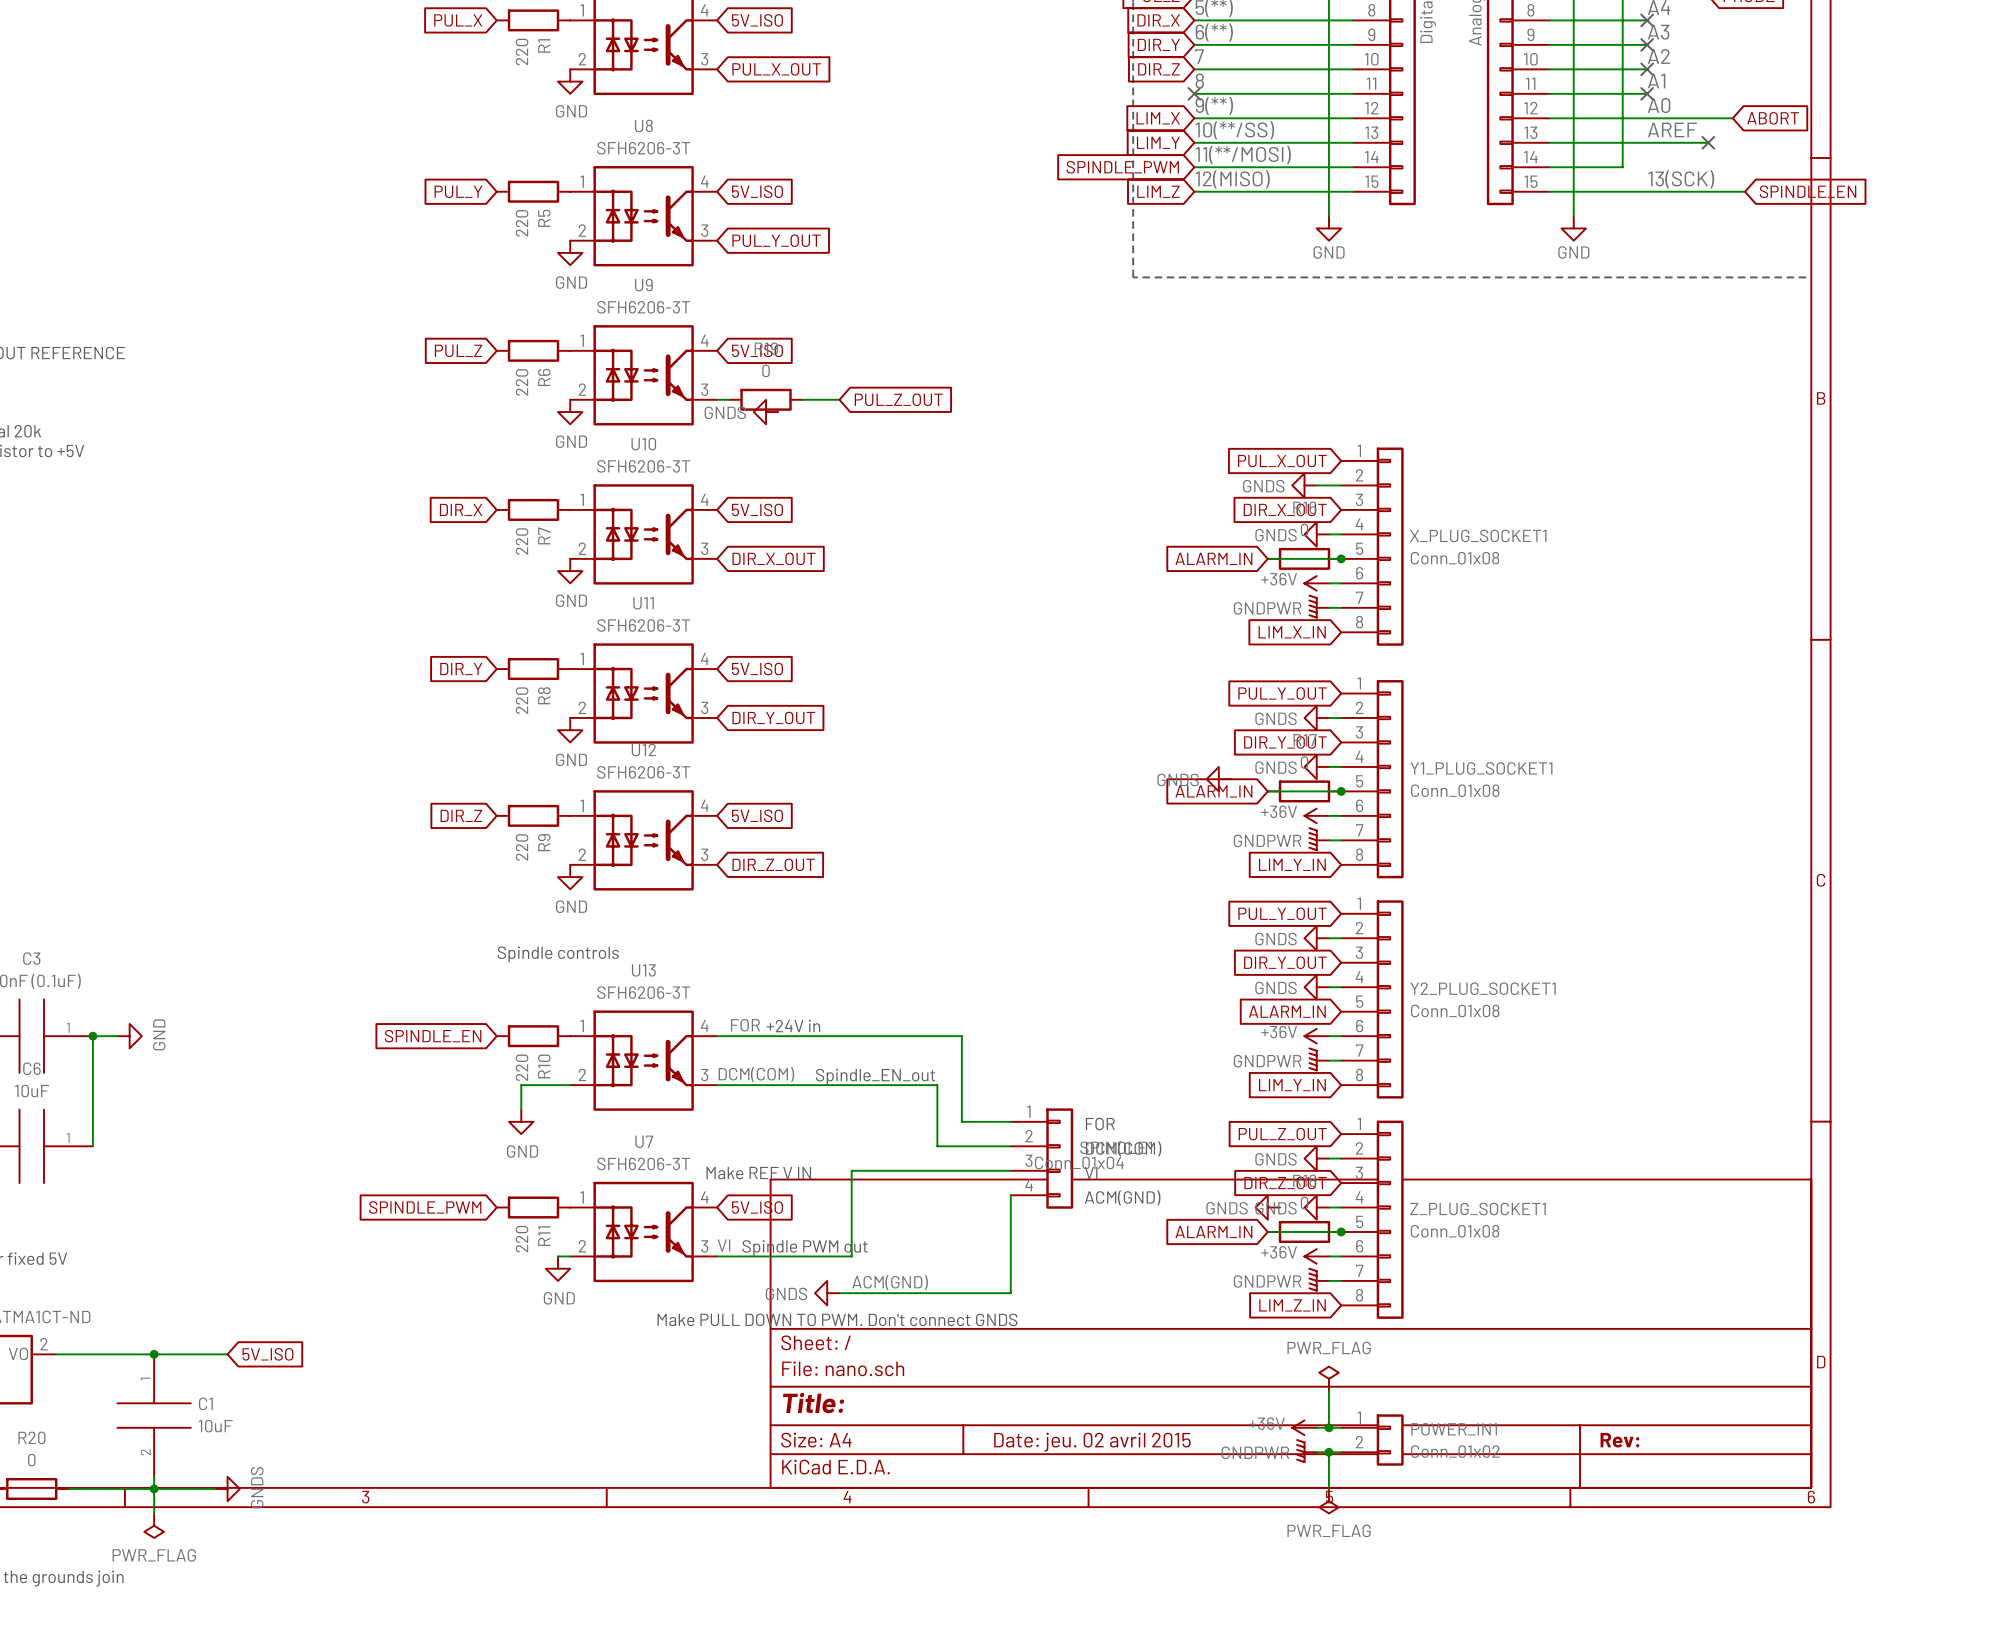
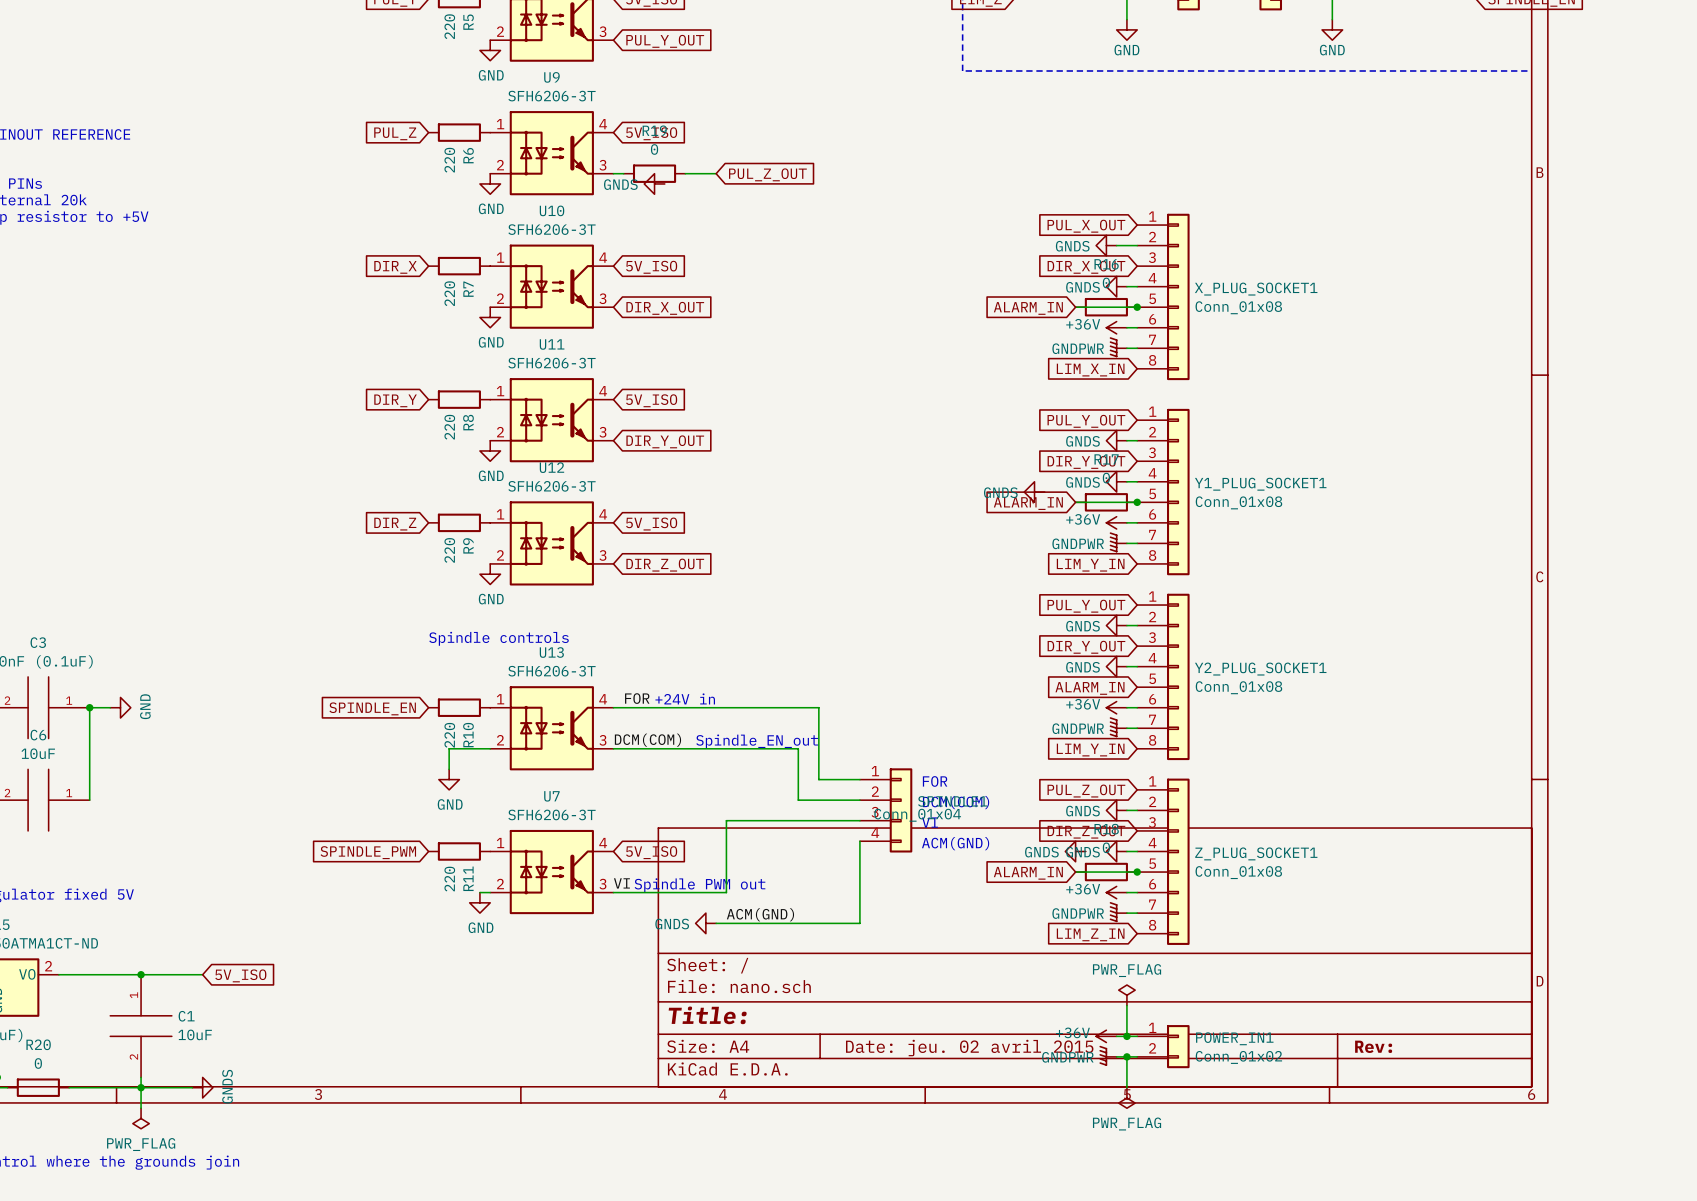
text: Make REF V IN (758, 1173) -> none
text: Make PULL DOWN TO PWM. Don't connect GNDS (837, 1319) -> none

